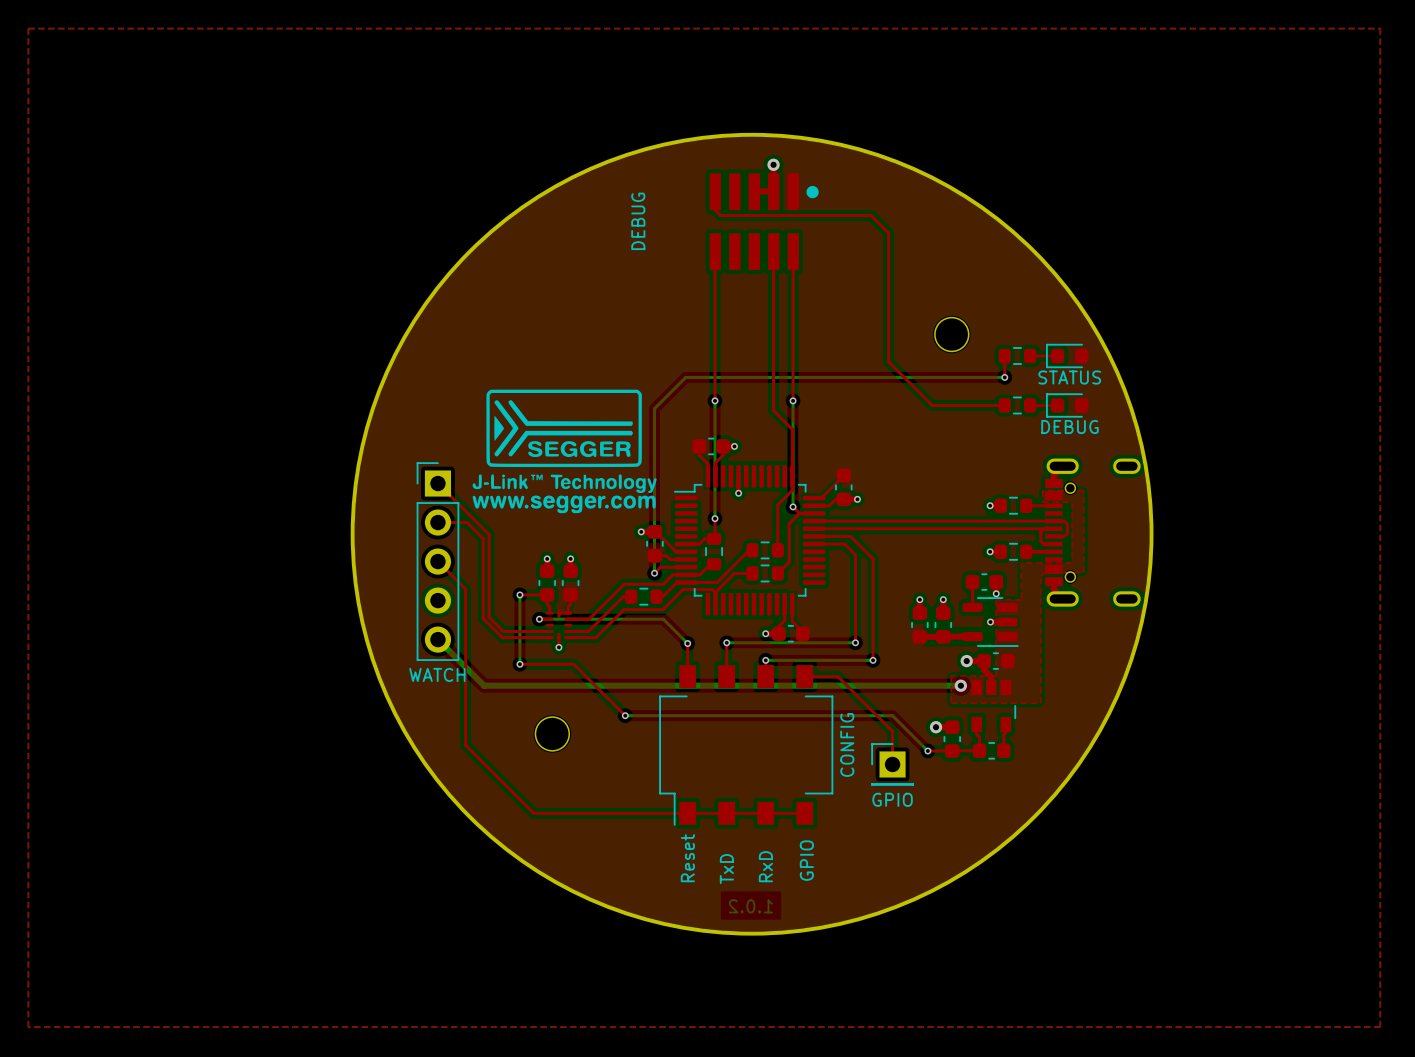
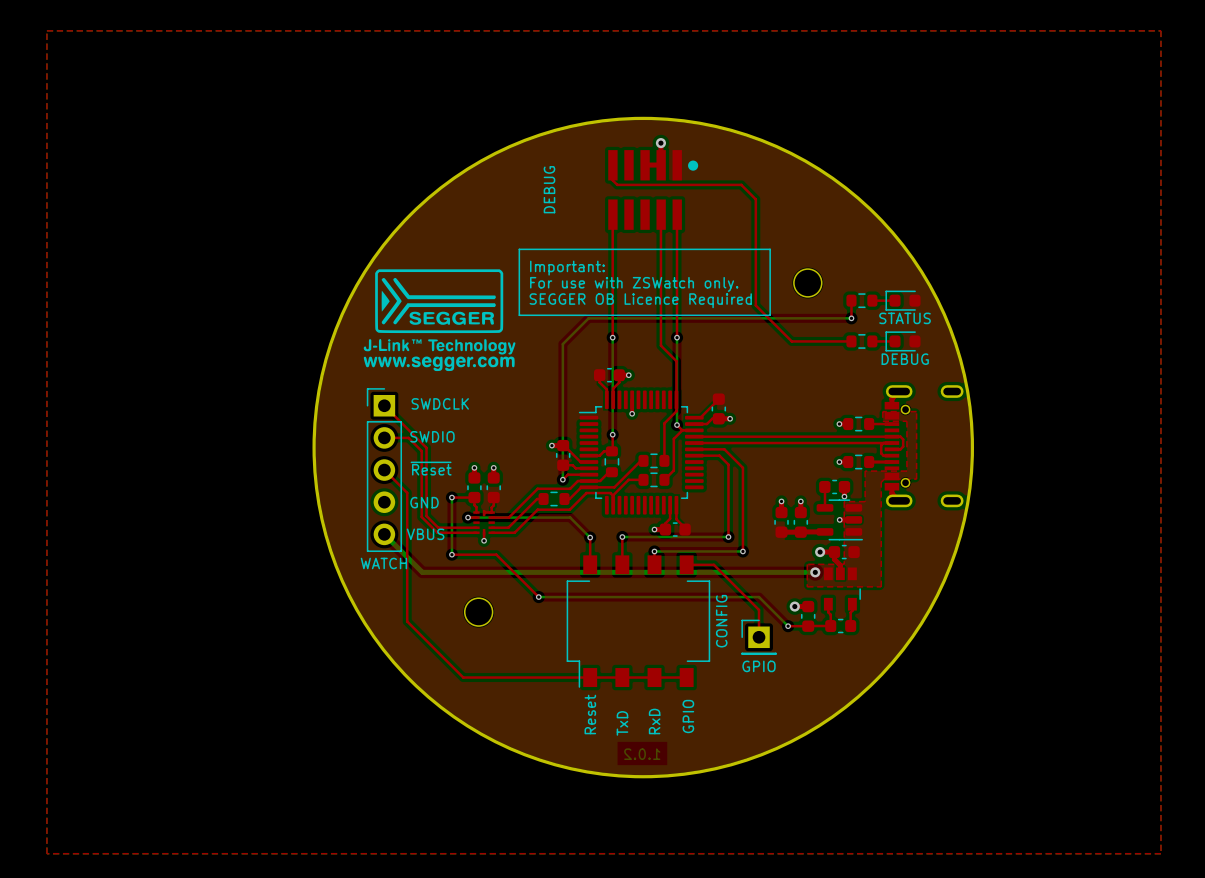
line: none -> (519, 249) (770, 249) (770, 315) (519, 315) (519, 249)
text: none -> Important: (567, 268)
text: none -> For use with ZSWatch only. (634, 284)
text: none -> SEGGER OB Licence Required (640, 300)
drawing position: (564, 451) -> (439, 320)
text: none -> SWDCLK (440, 403)
text: none -> SWDIO (432, 436)
text: none -> ~{Reset} (431, 468)
text: none -> GND (424, 502)
text: none -> VBUS (425, 534)

